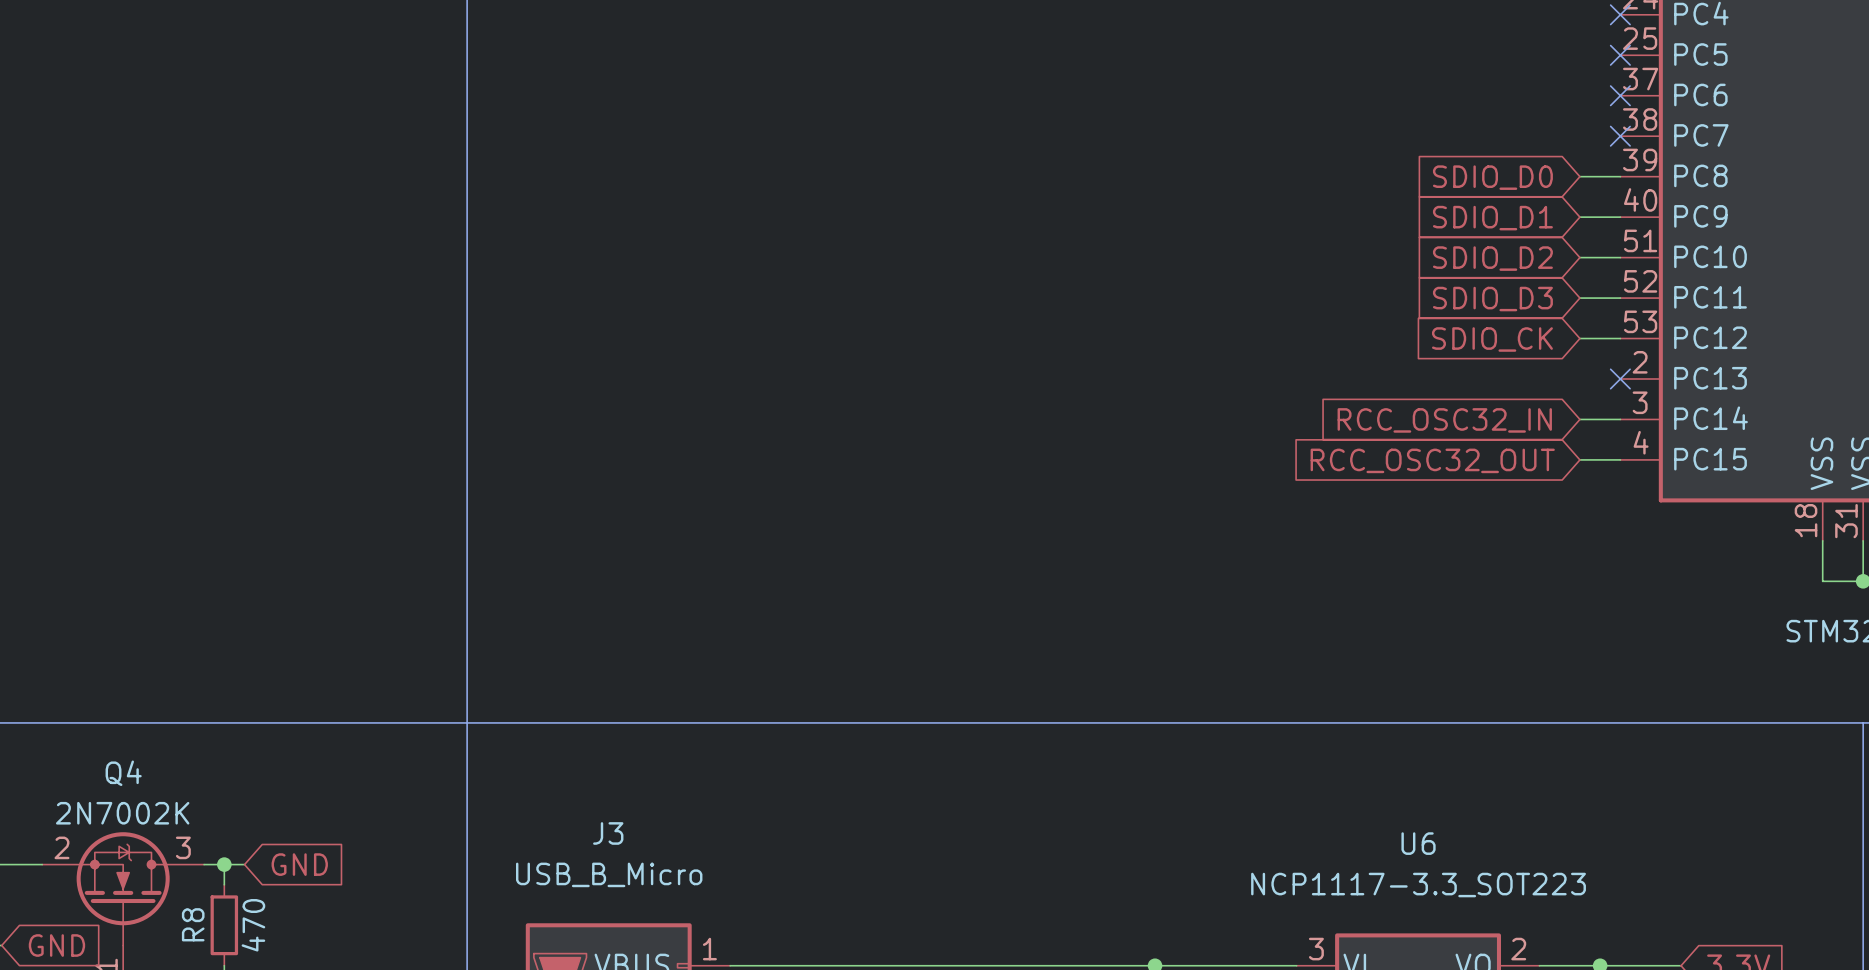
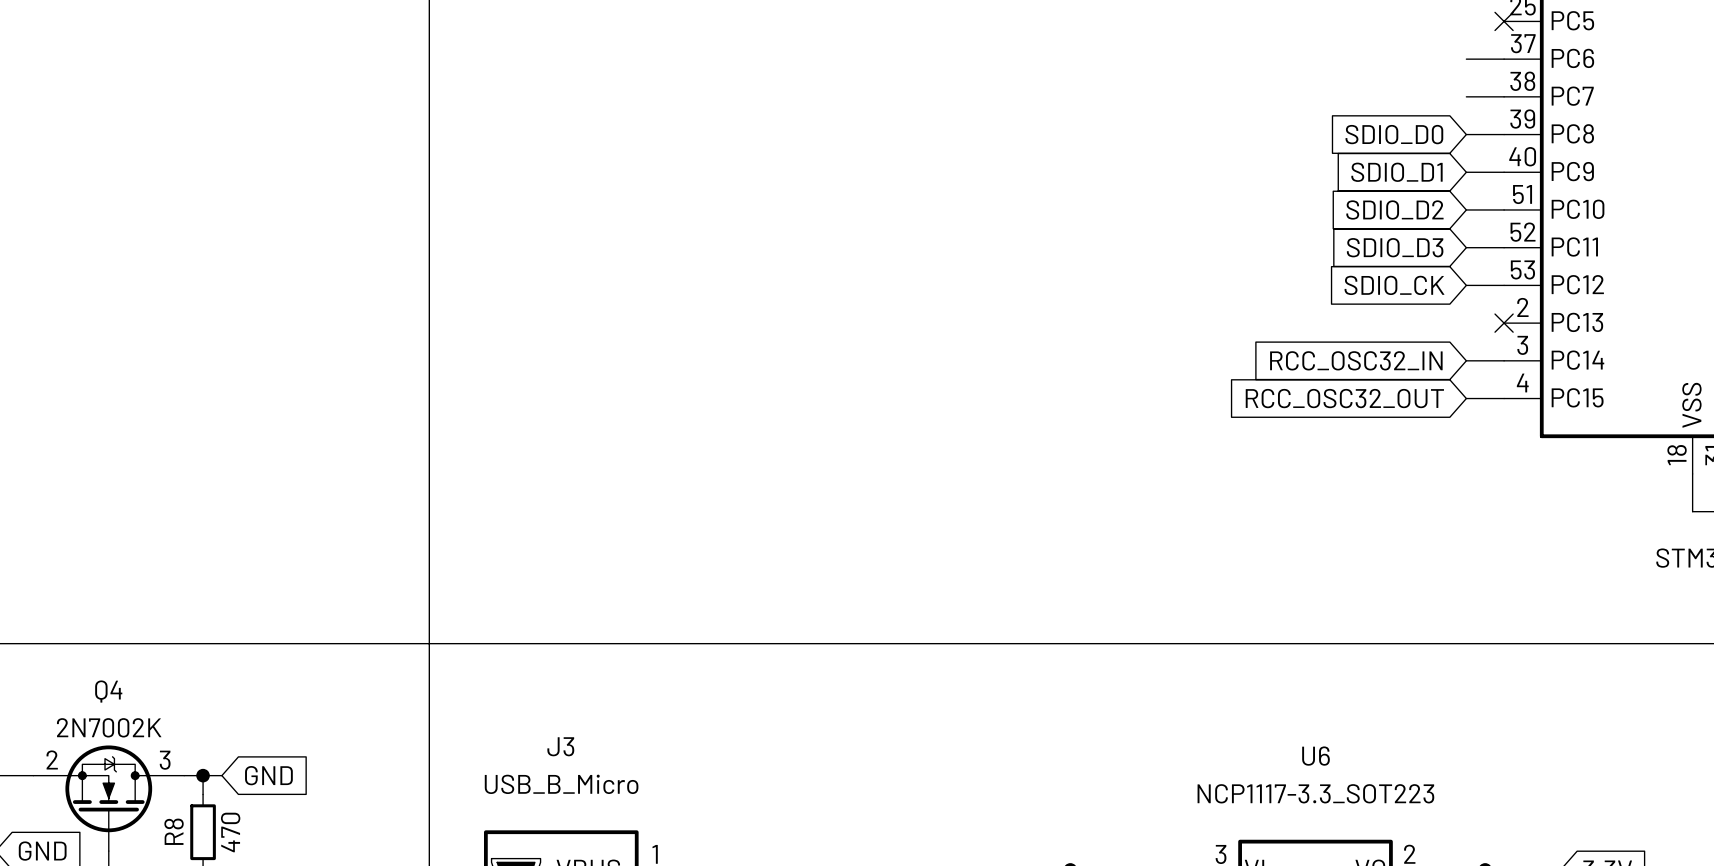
wire: none -> (1466, 59) (1504, 59)
no-connect mark: (1620, 95) -> none
wire: none -> (1466, 96) (1504, 96)
no-connect mark: (1620, 136) -> none

